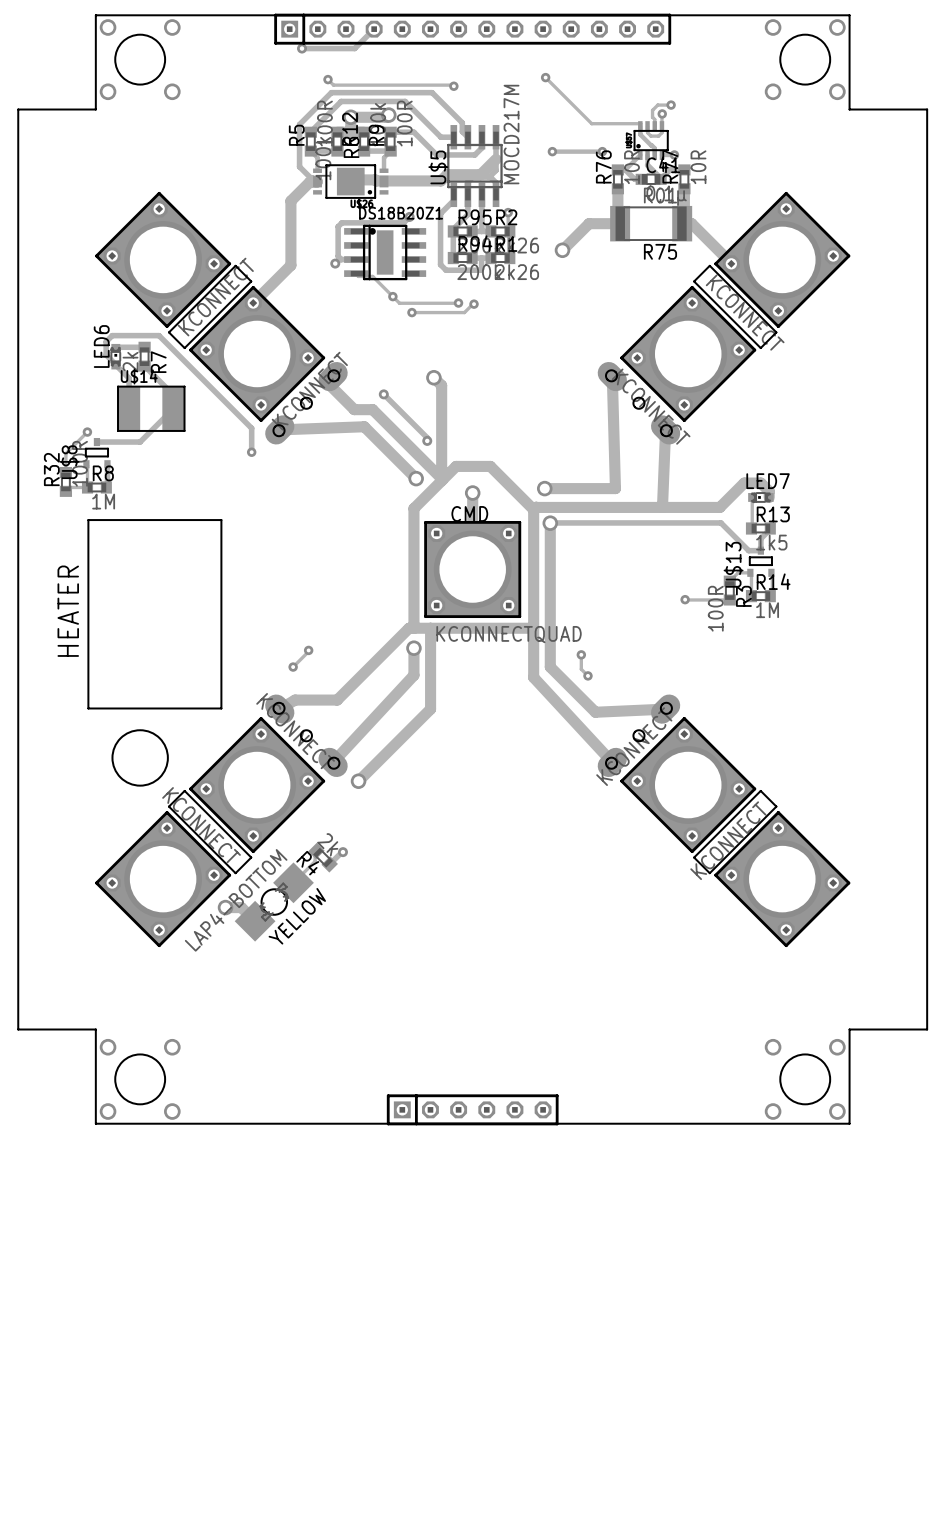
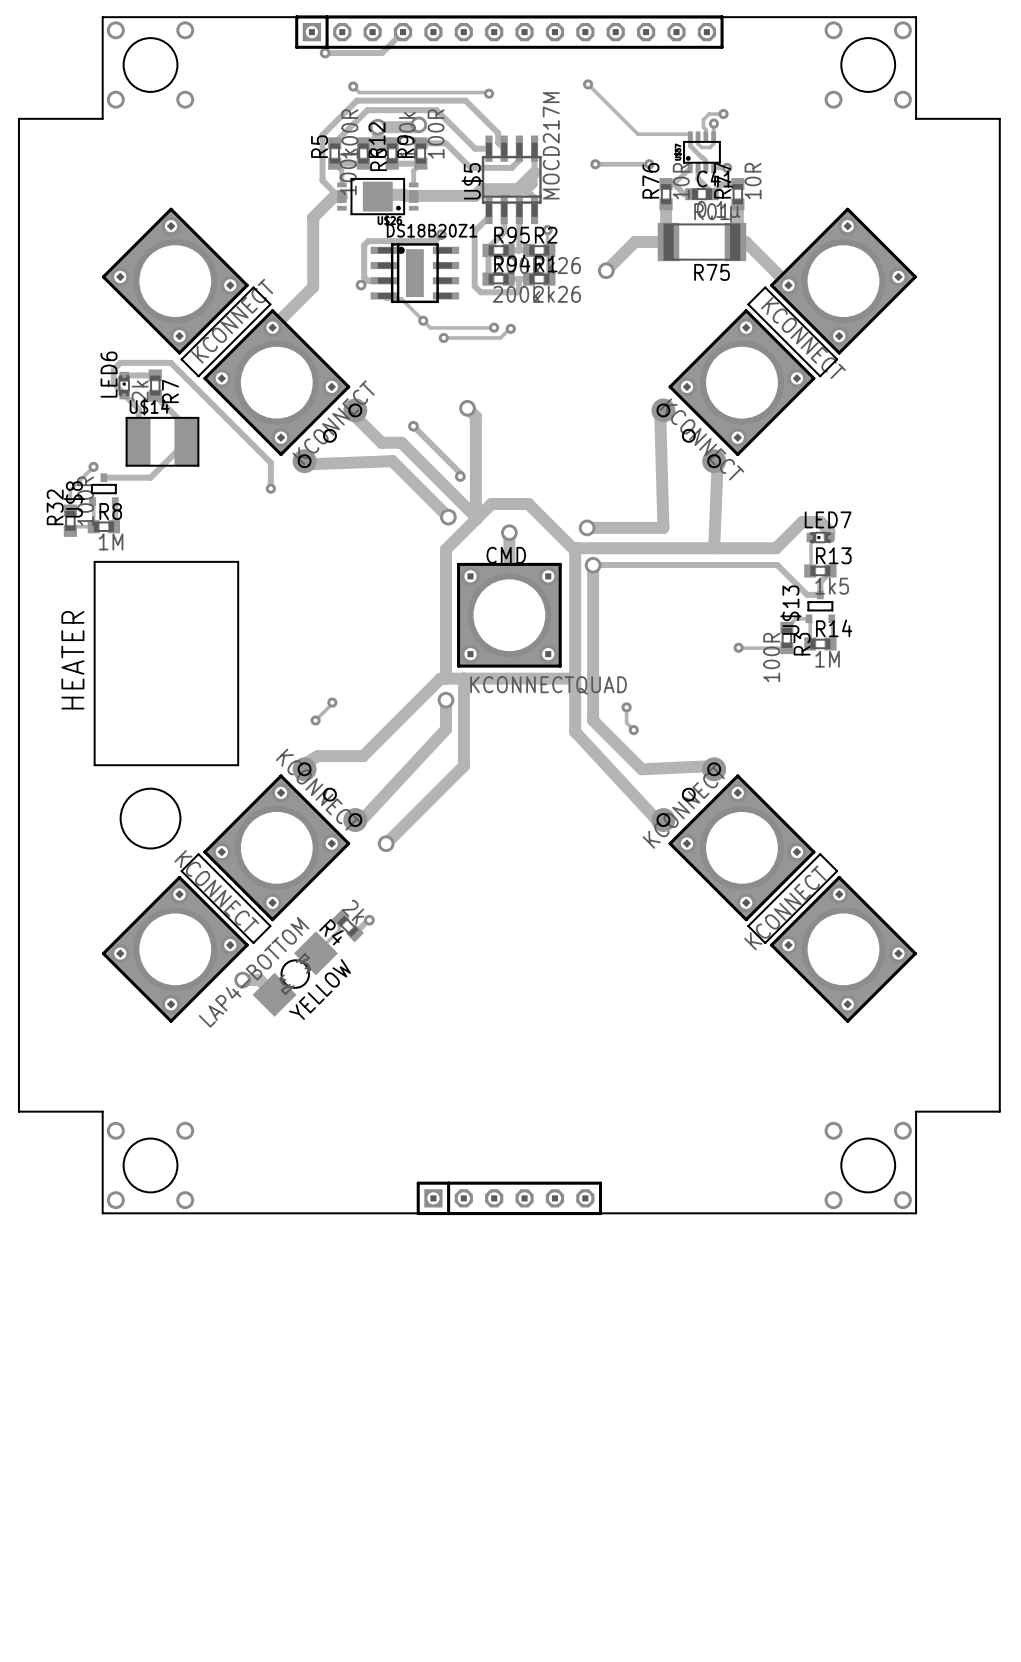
part footprint: [265, 361, 348, 445] -> [292, 398, 368, 474]
part footprint: [597, 361, 681, 445] -> [651, 398, 727, 474]
part footprint: [265, 694, 348, 778] -> [292, 757, 368, 833]
part footprint: [597, 694, 681, 778] -> [651, 757, 727, 833]

